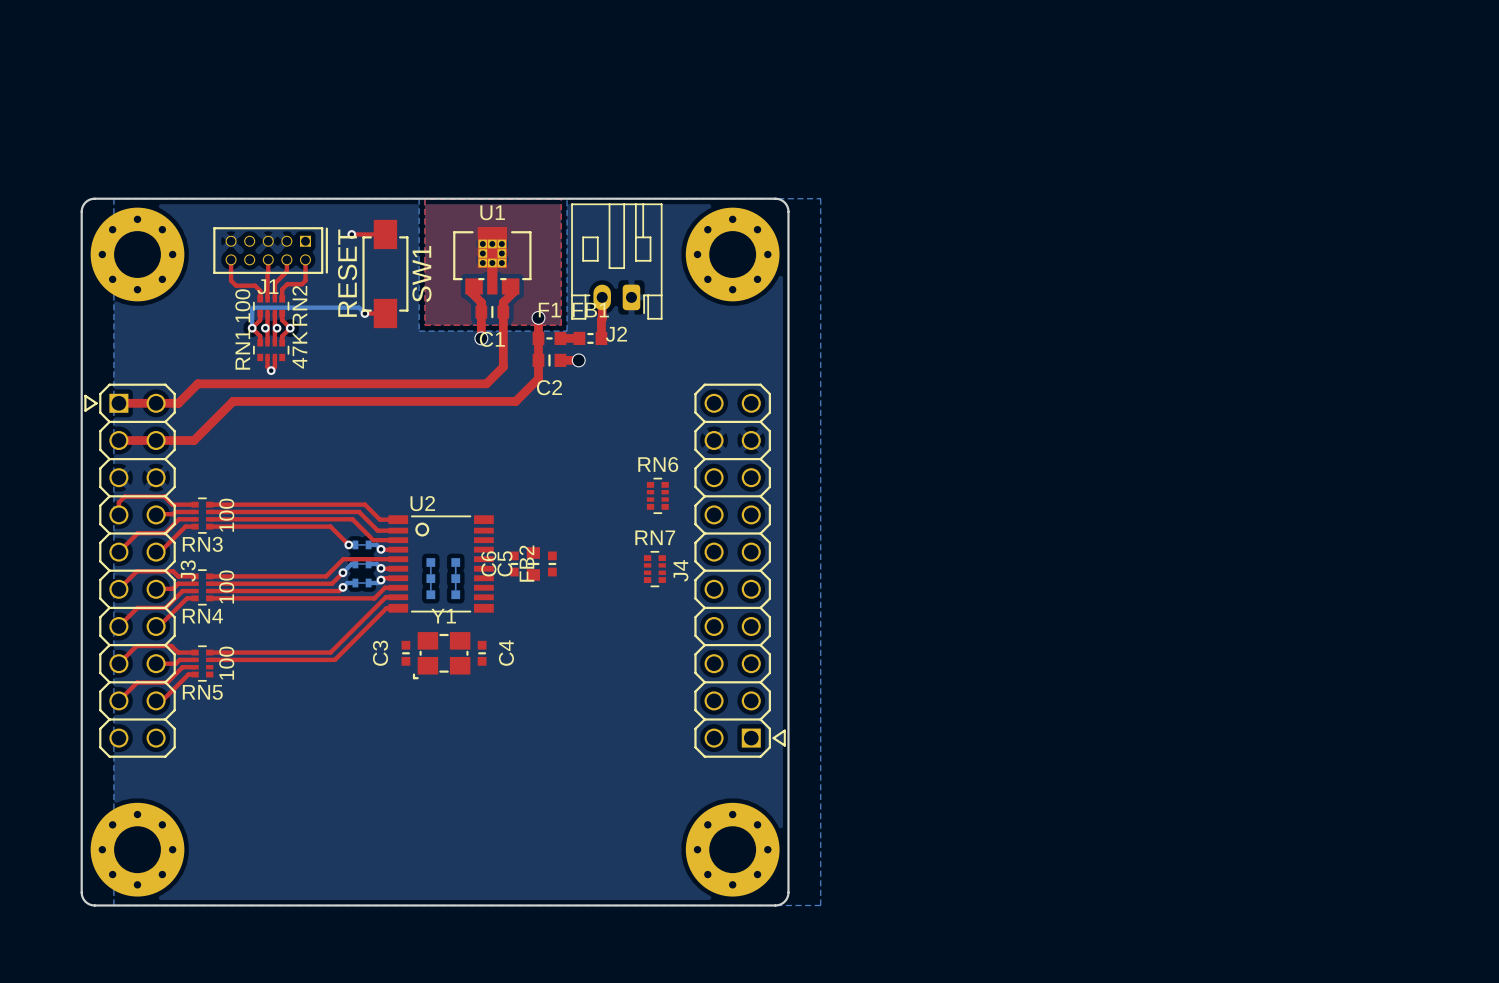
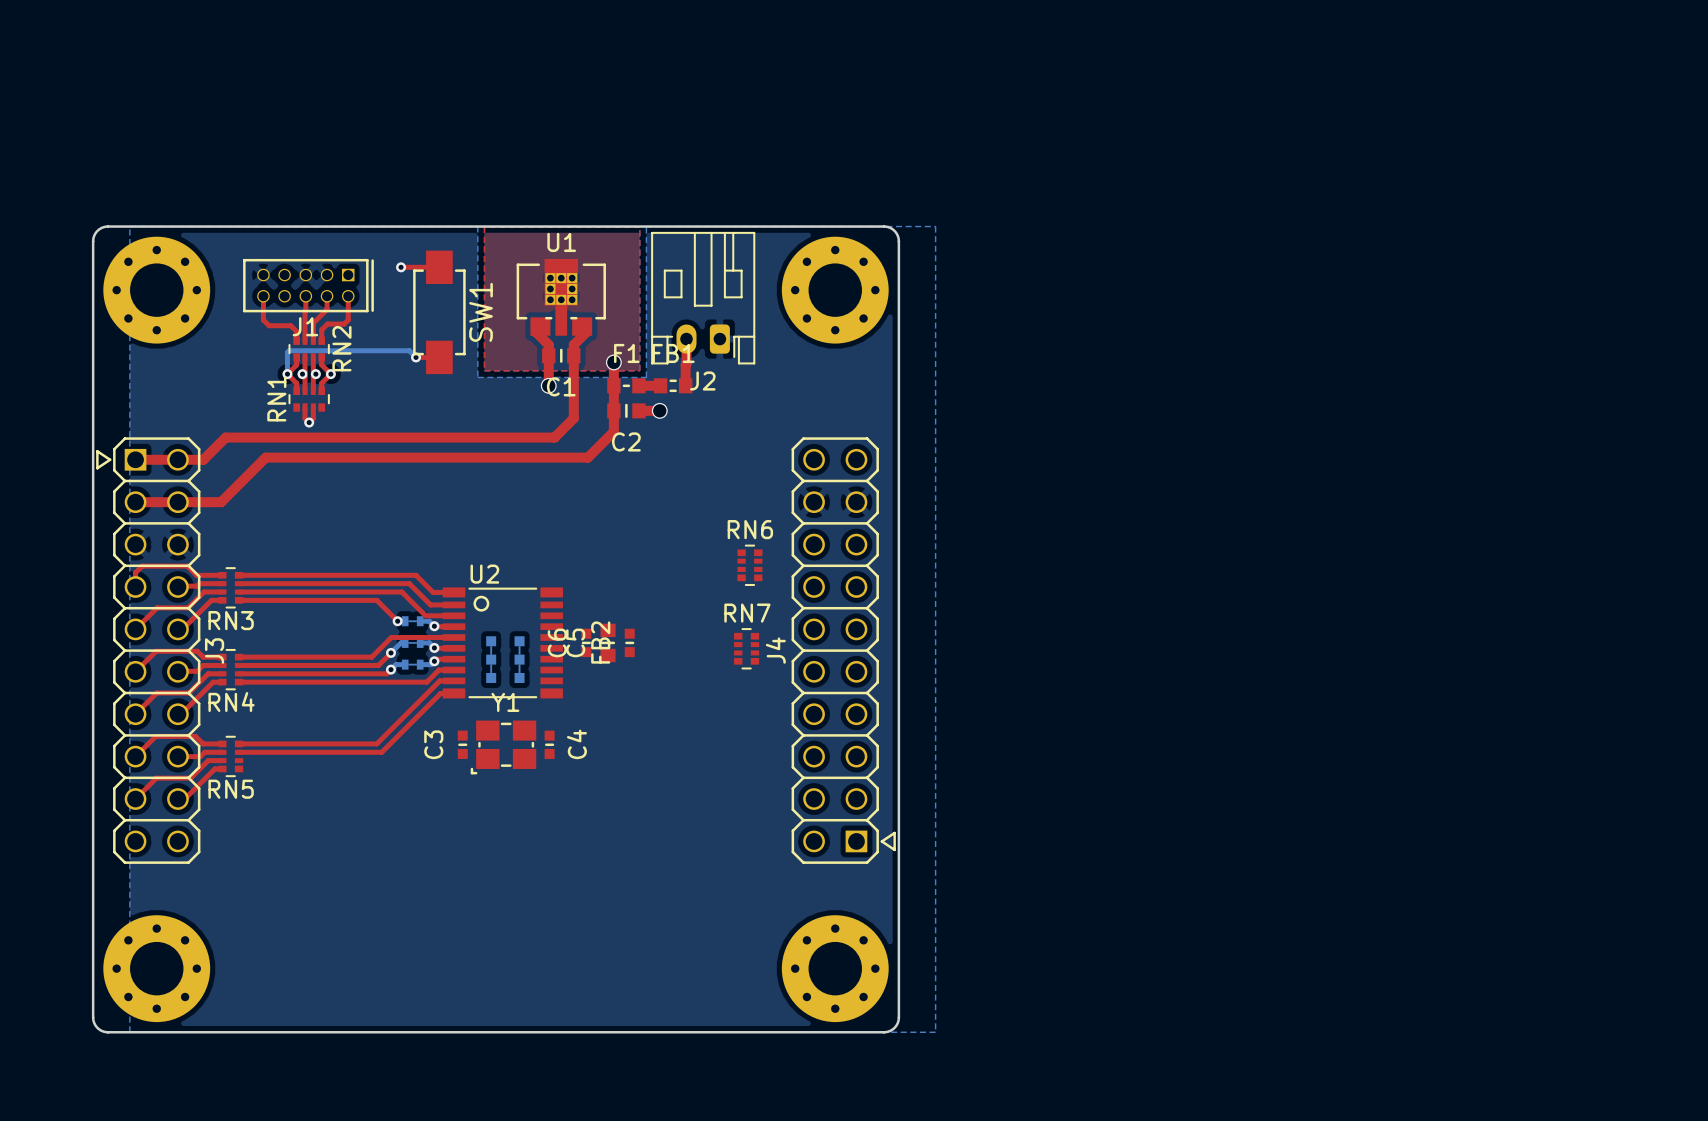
SW1 value: RESET (347, 273) -> none
RN2 value: 100 (242, 305) -> none
RN1 value: 47K (299, 350) -> none
RN3 value: 100 (226, 515) -> none
RN4 value: 100 (226, 587) -> none
RN5 value: 100 (226, 663) -> none

